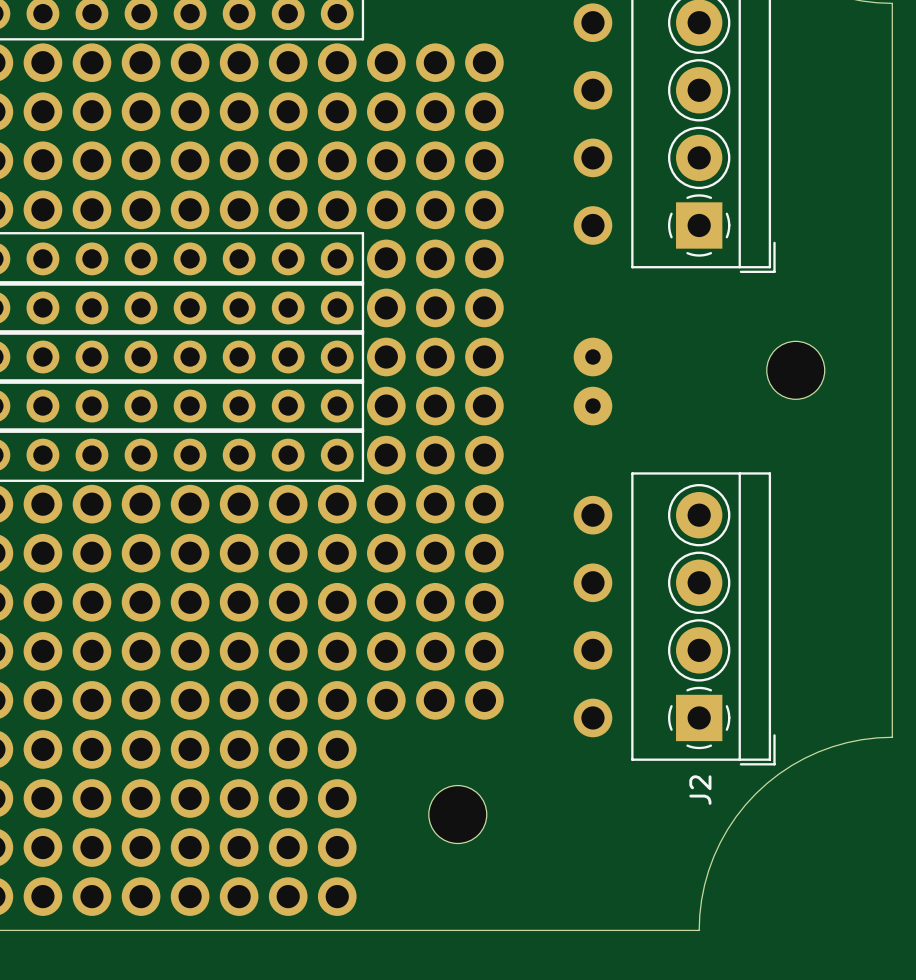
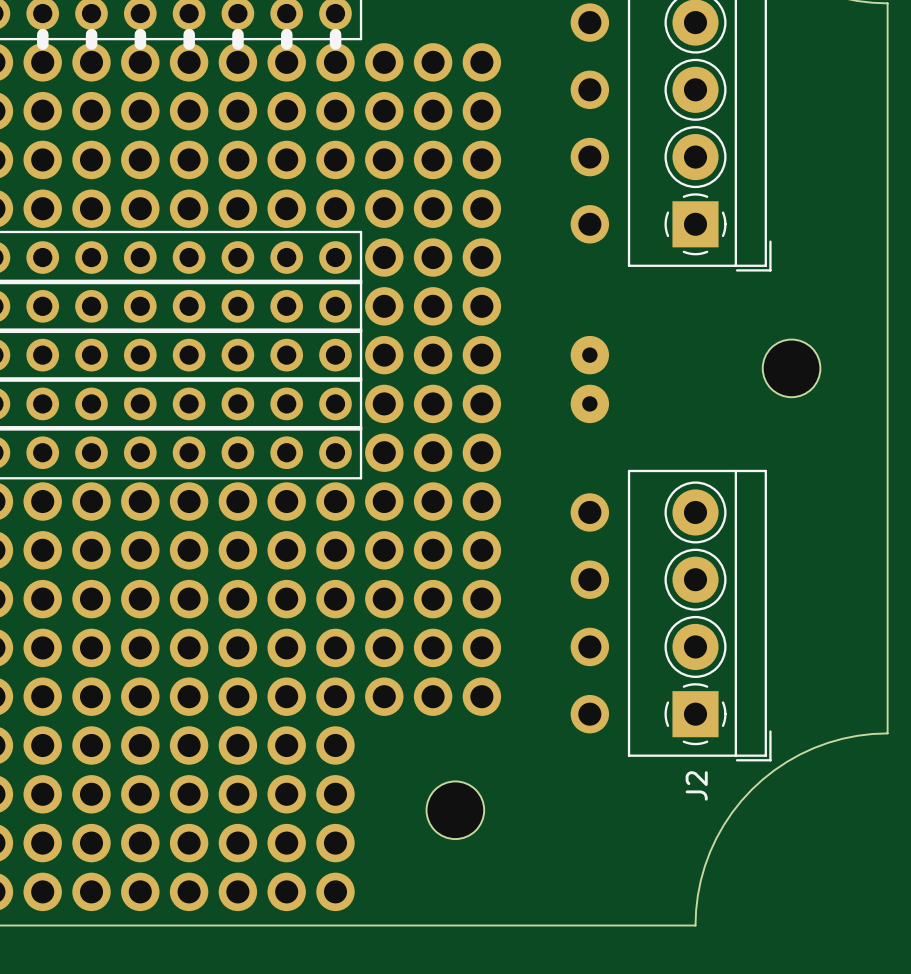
line: none -> (42, 34) (42, 44)
line: none -> (91, 34) (91, 44)
line: none -> (140, 34) (140, 44)
line: none -> (189, 34) (189, 44)
line: none -> (237, 34) (237, 44)
line: none -> (286, 34) (286, 44)
line: none -> (335, 34) (335, 44)

